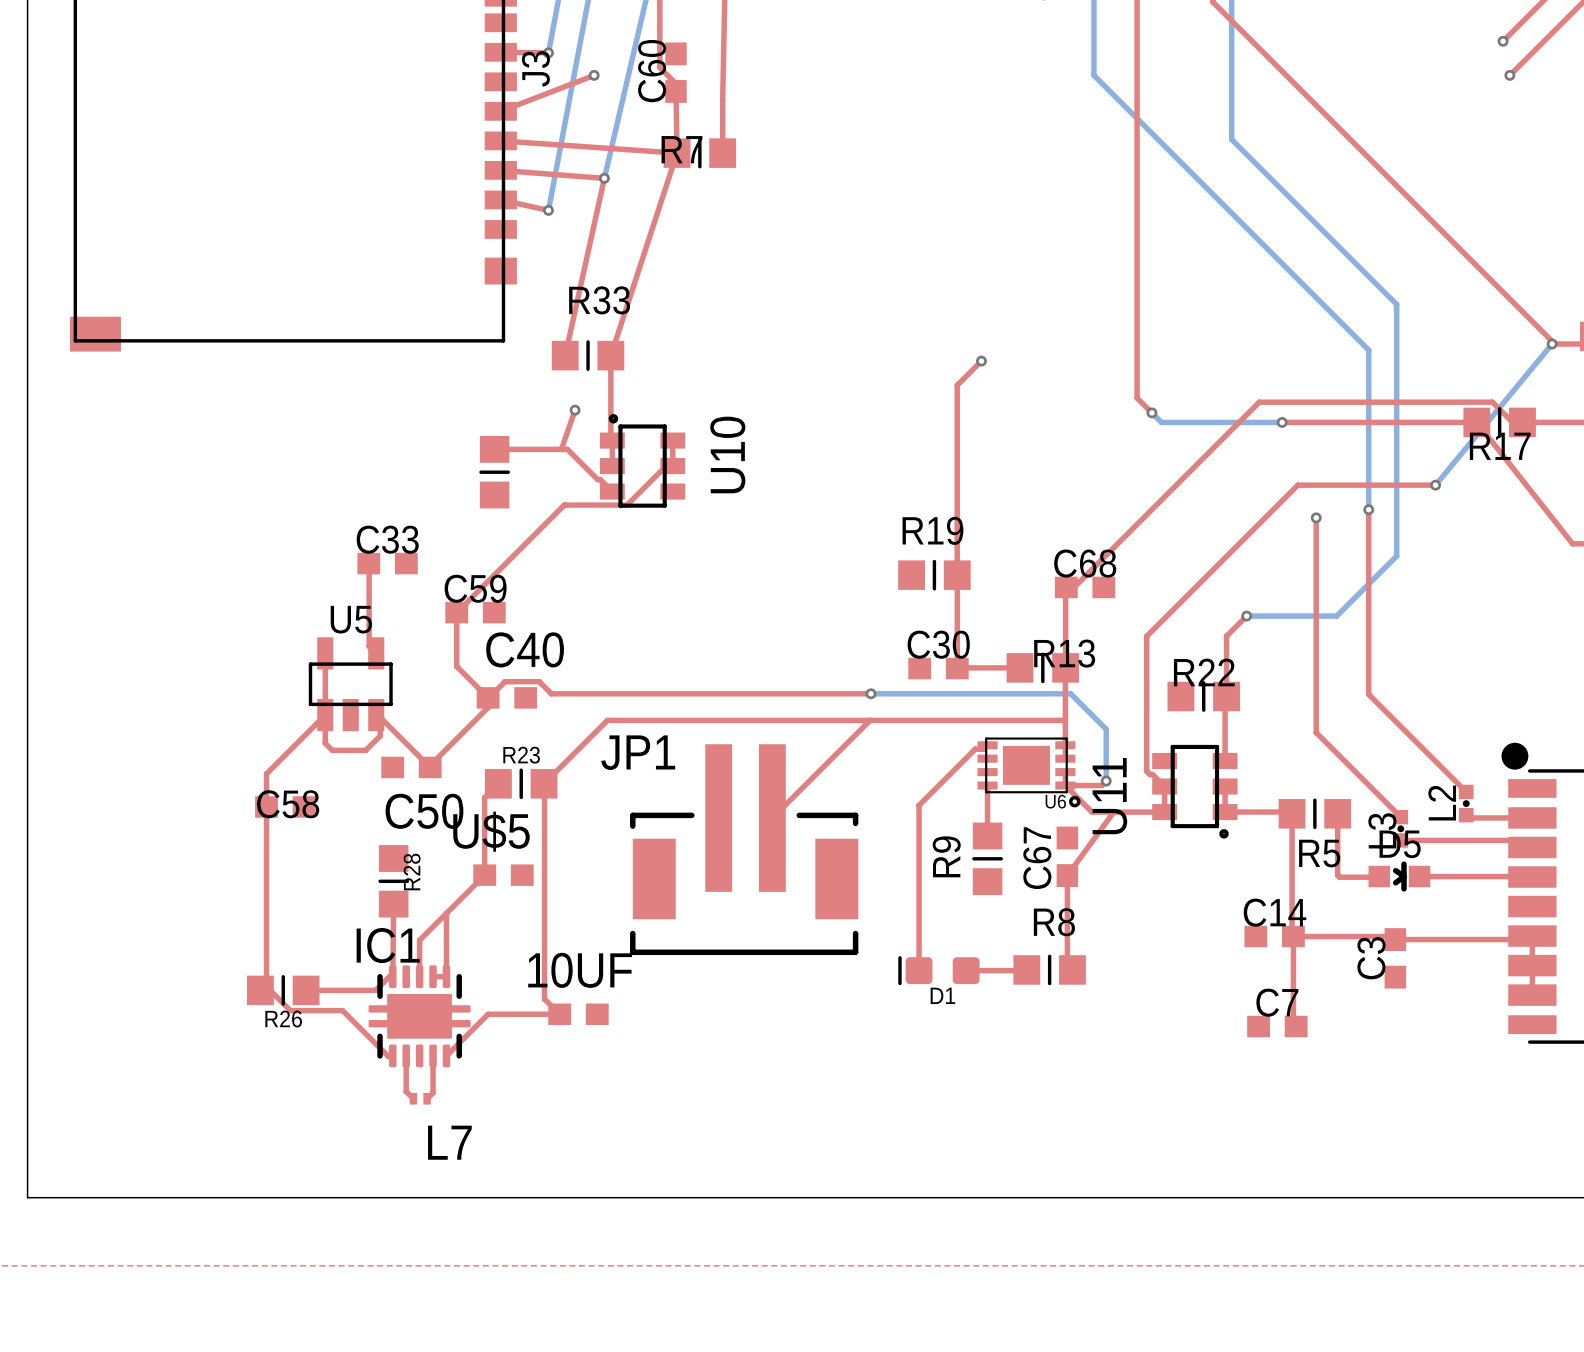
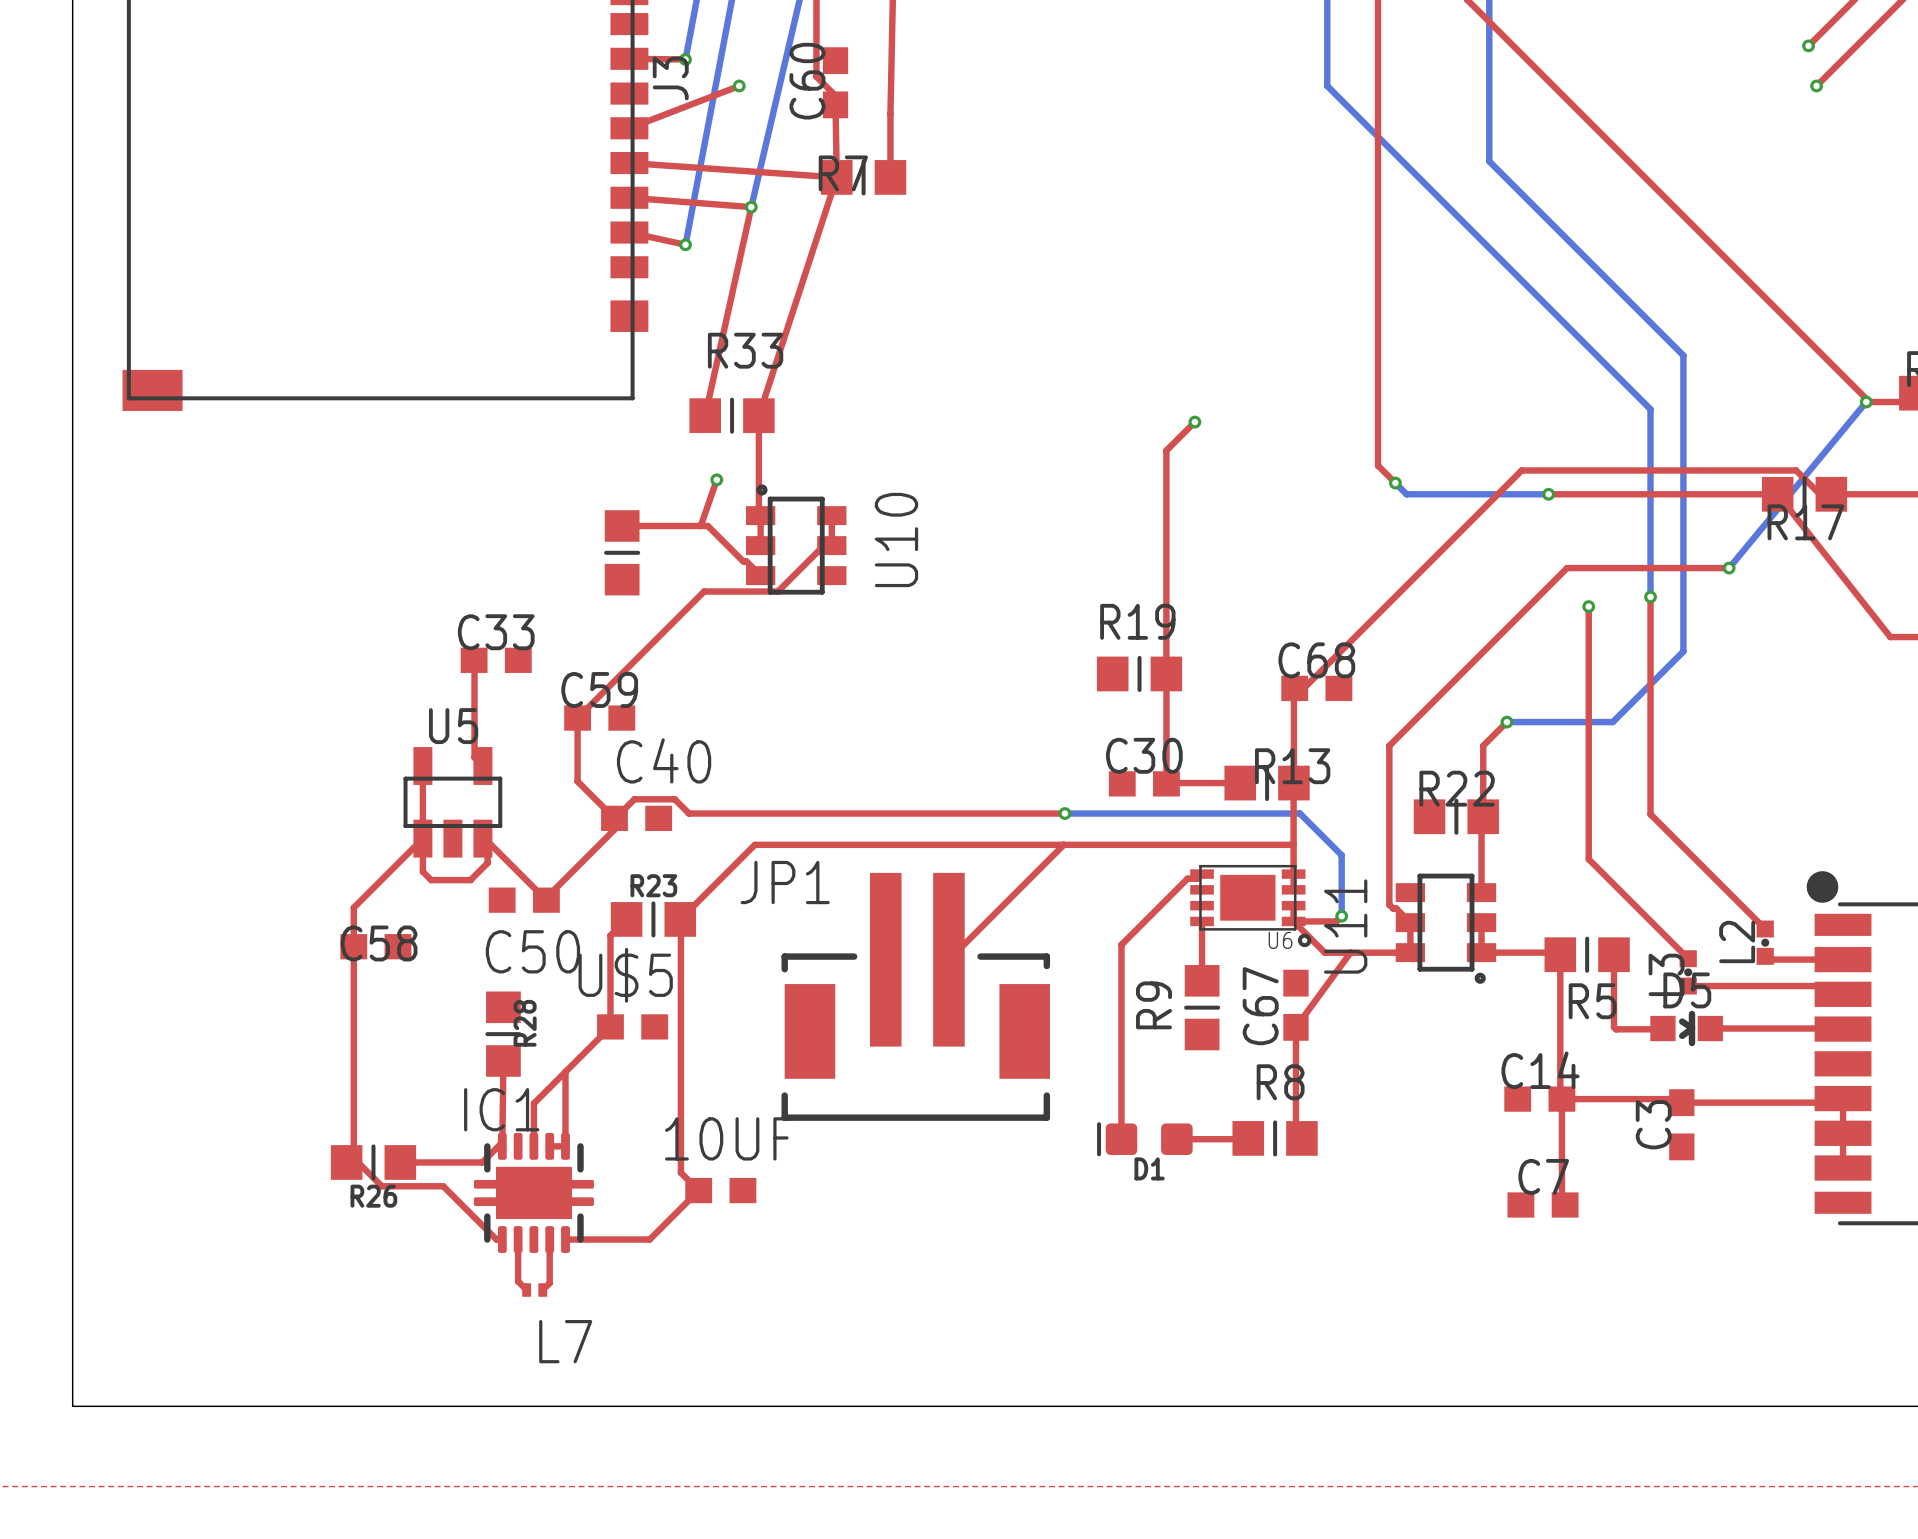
top track: (558, 1013) (559, 1014) (488, 1014) (446, 1055) -> (698, 1190) (649, 1239) (565, 1239)

